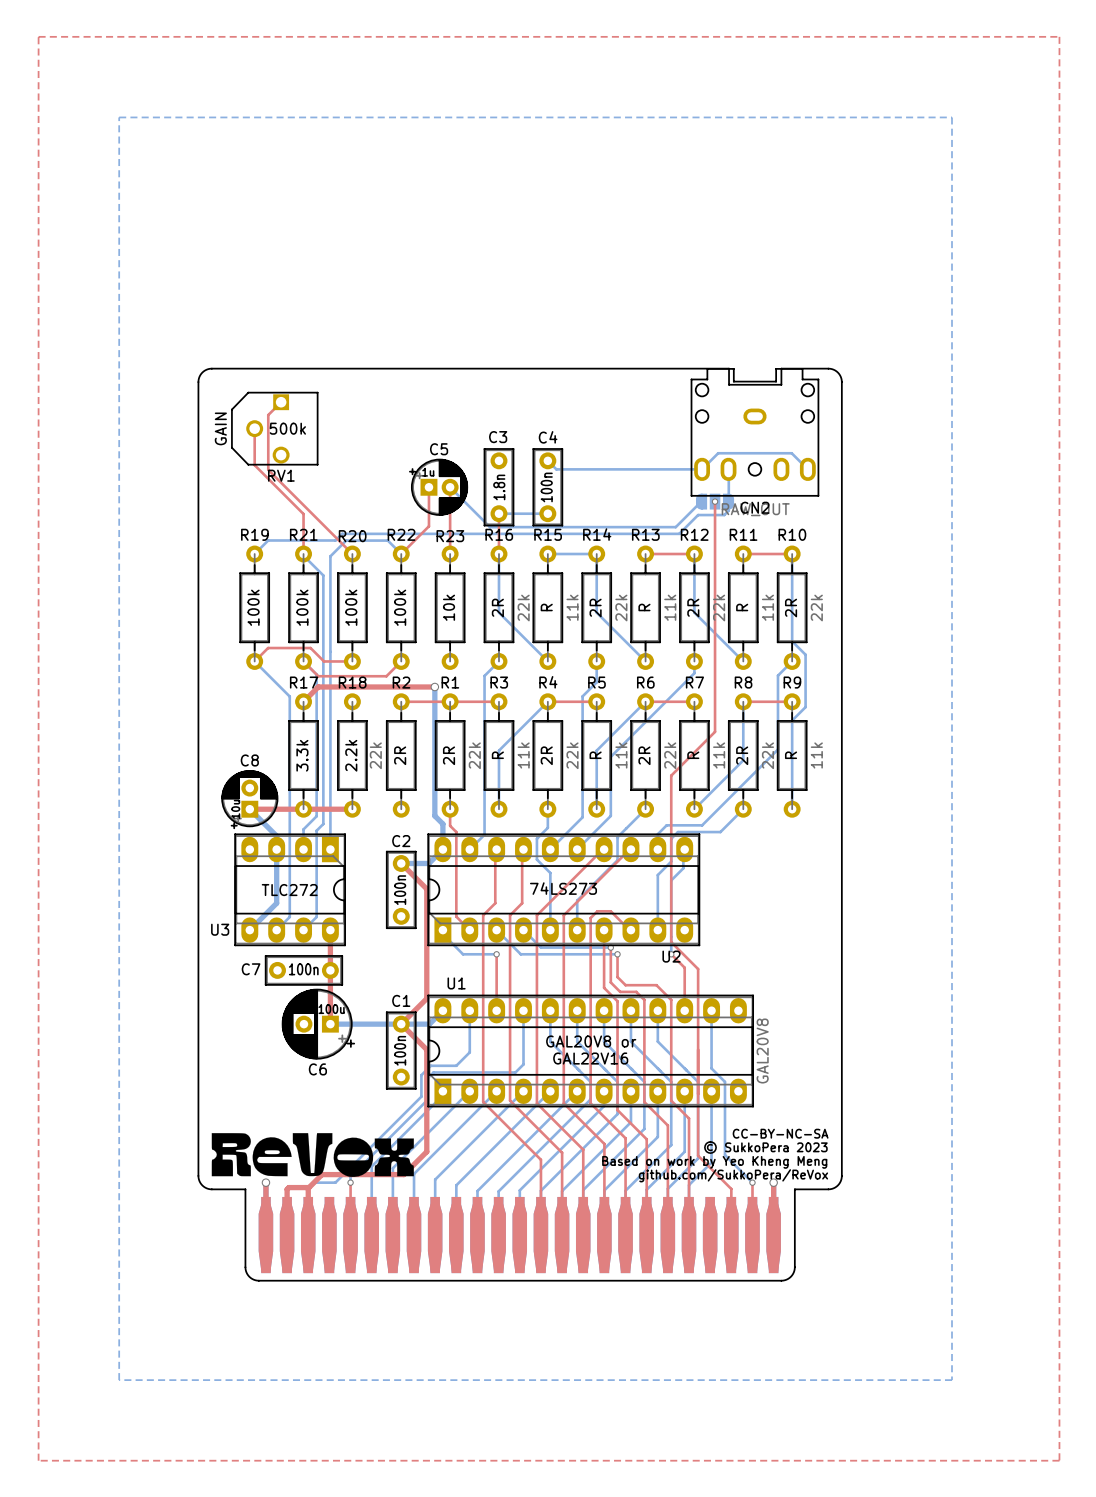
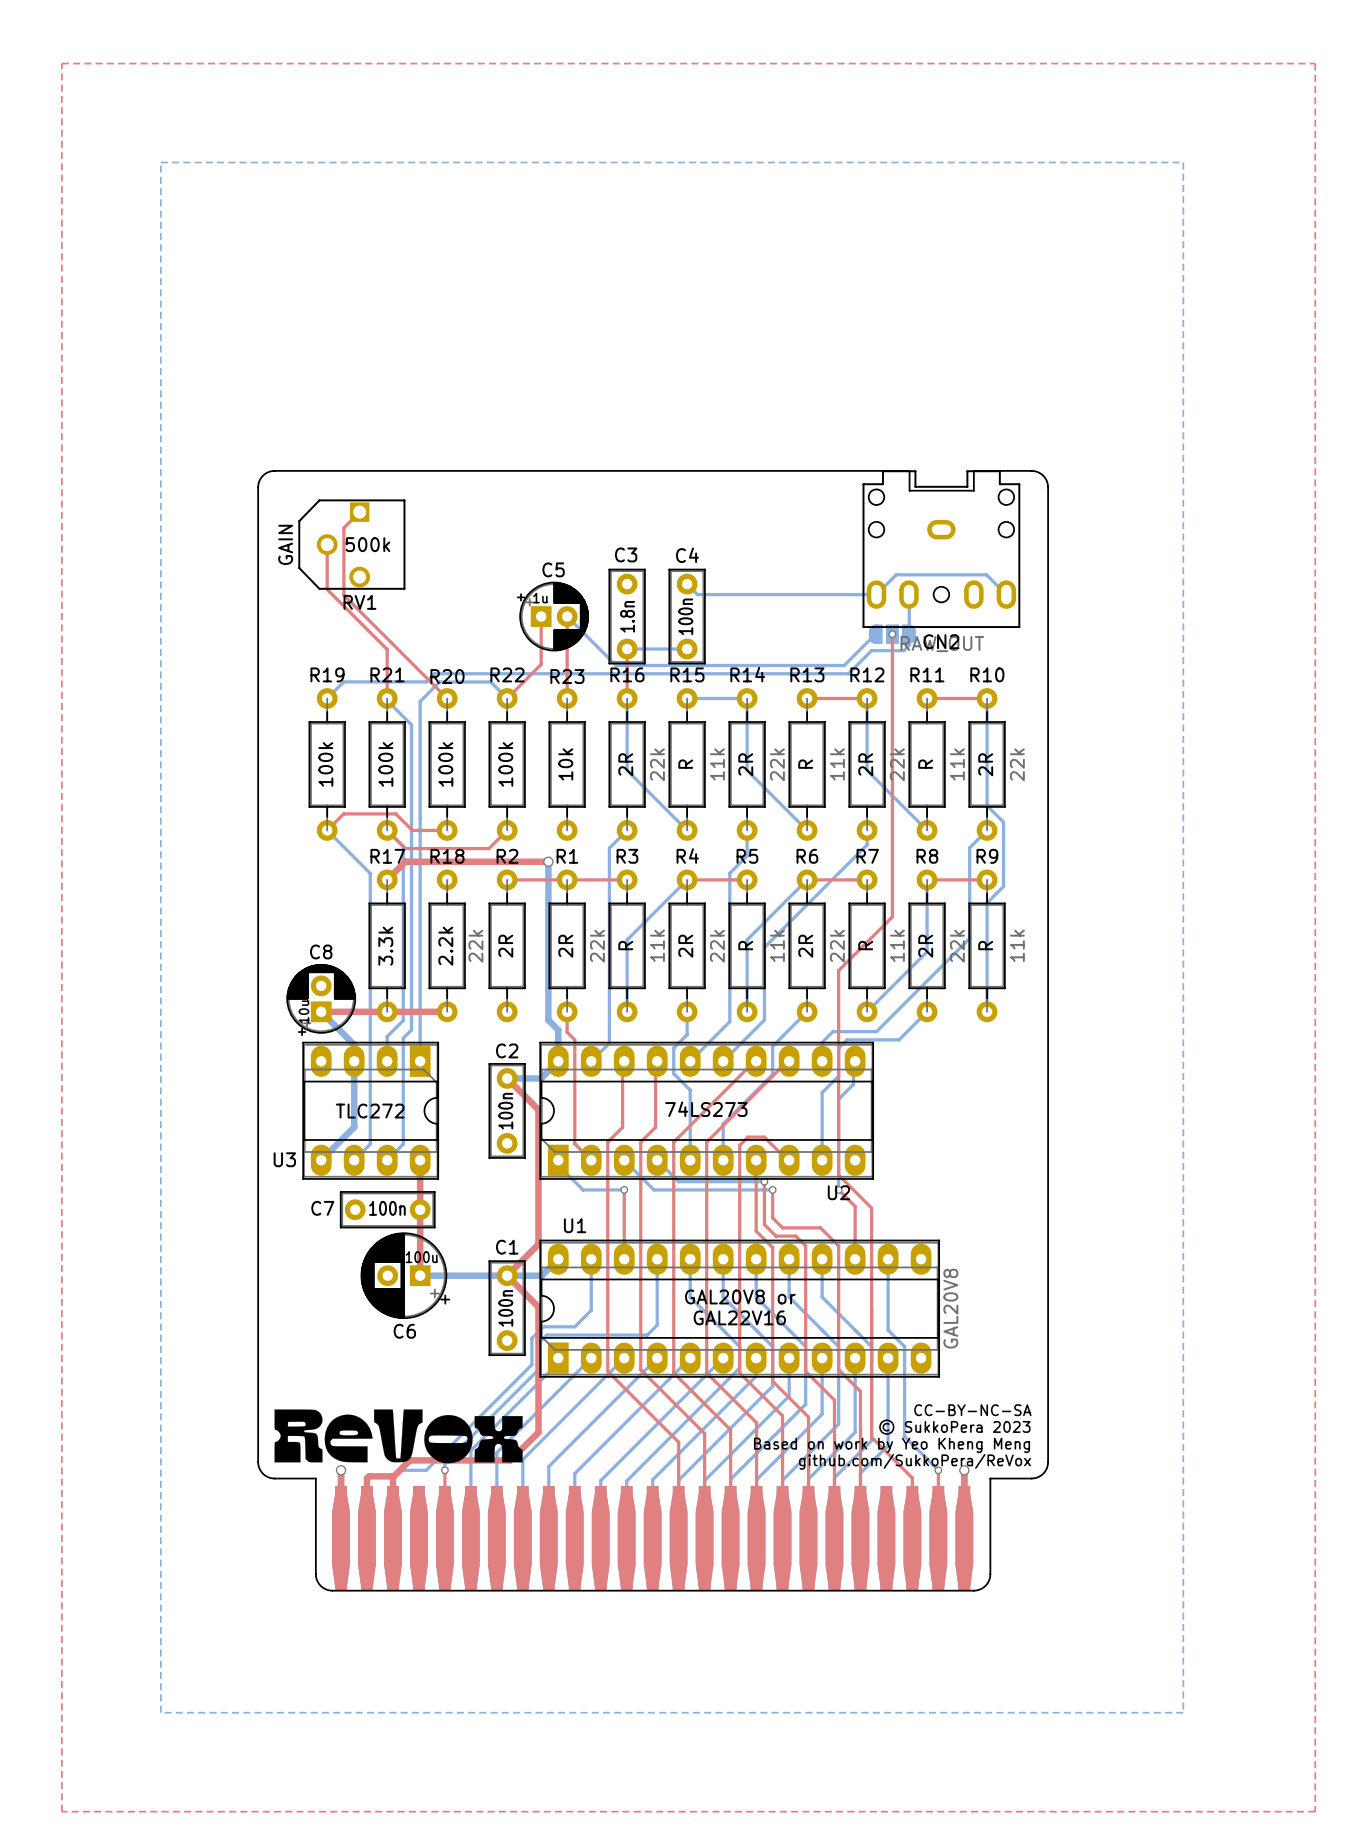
part footprint: [258, 1196, 781, 1274] -> [332, 1485, 974, 1590]

